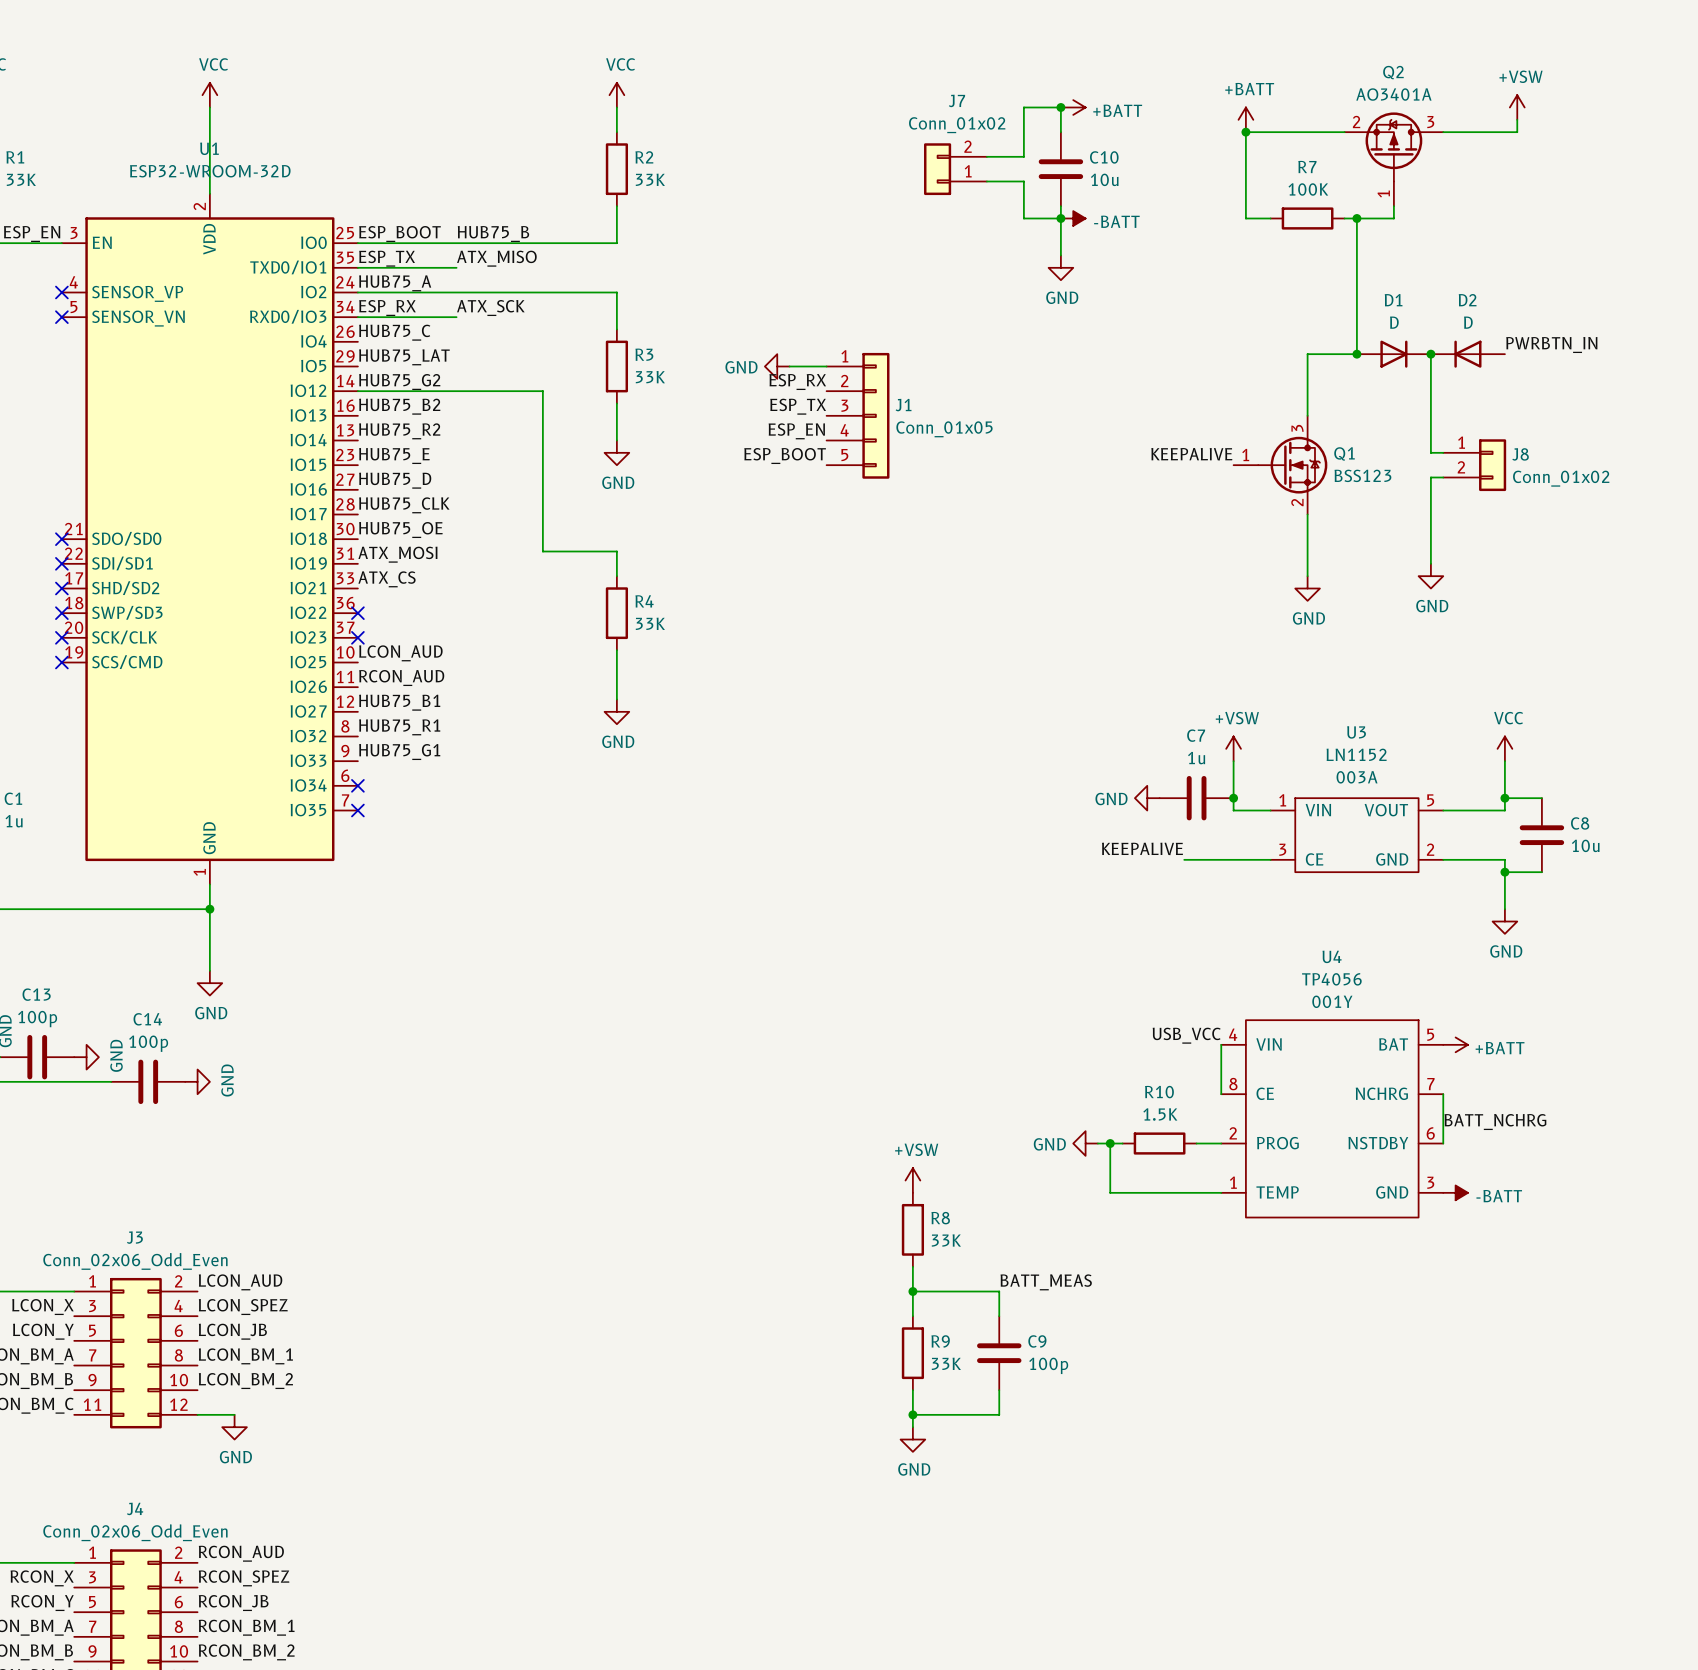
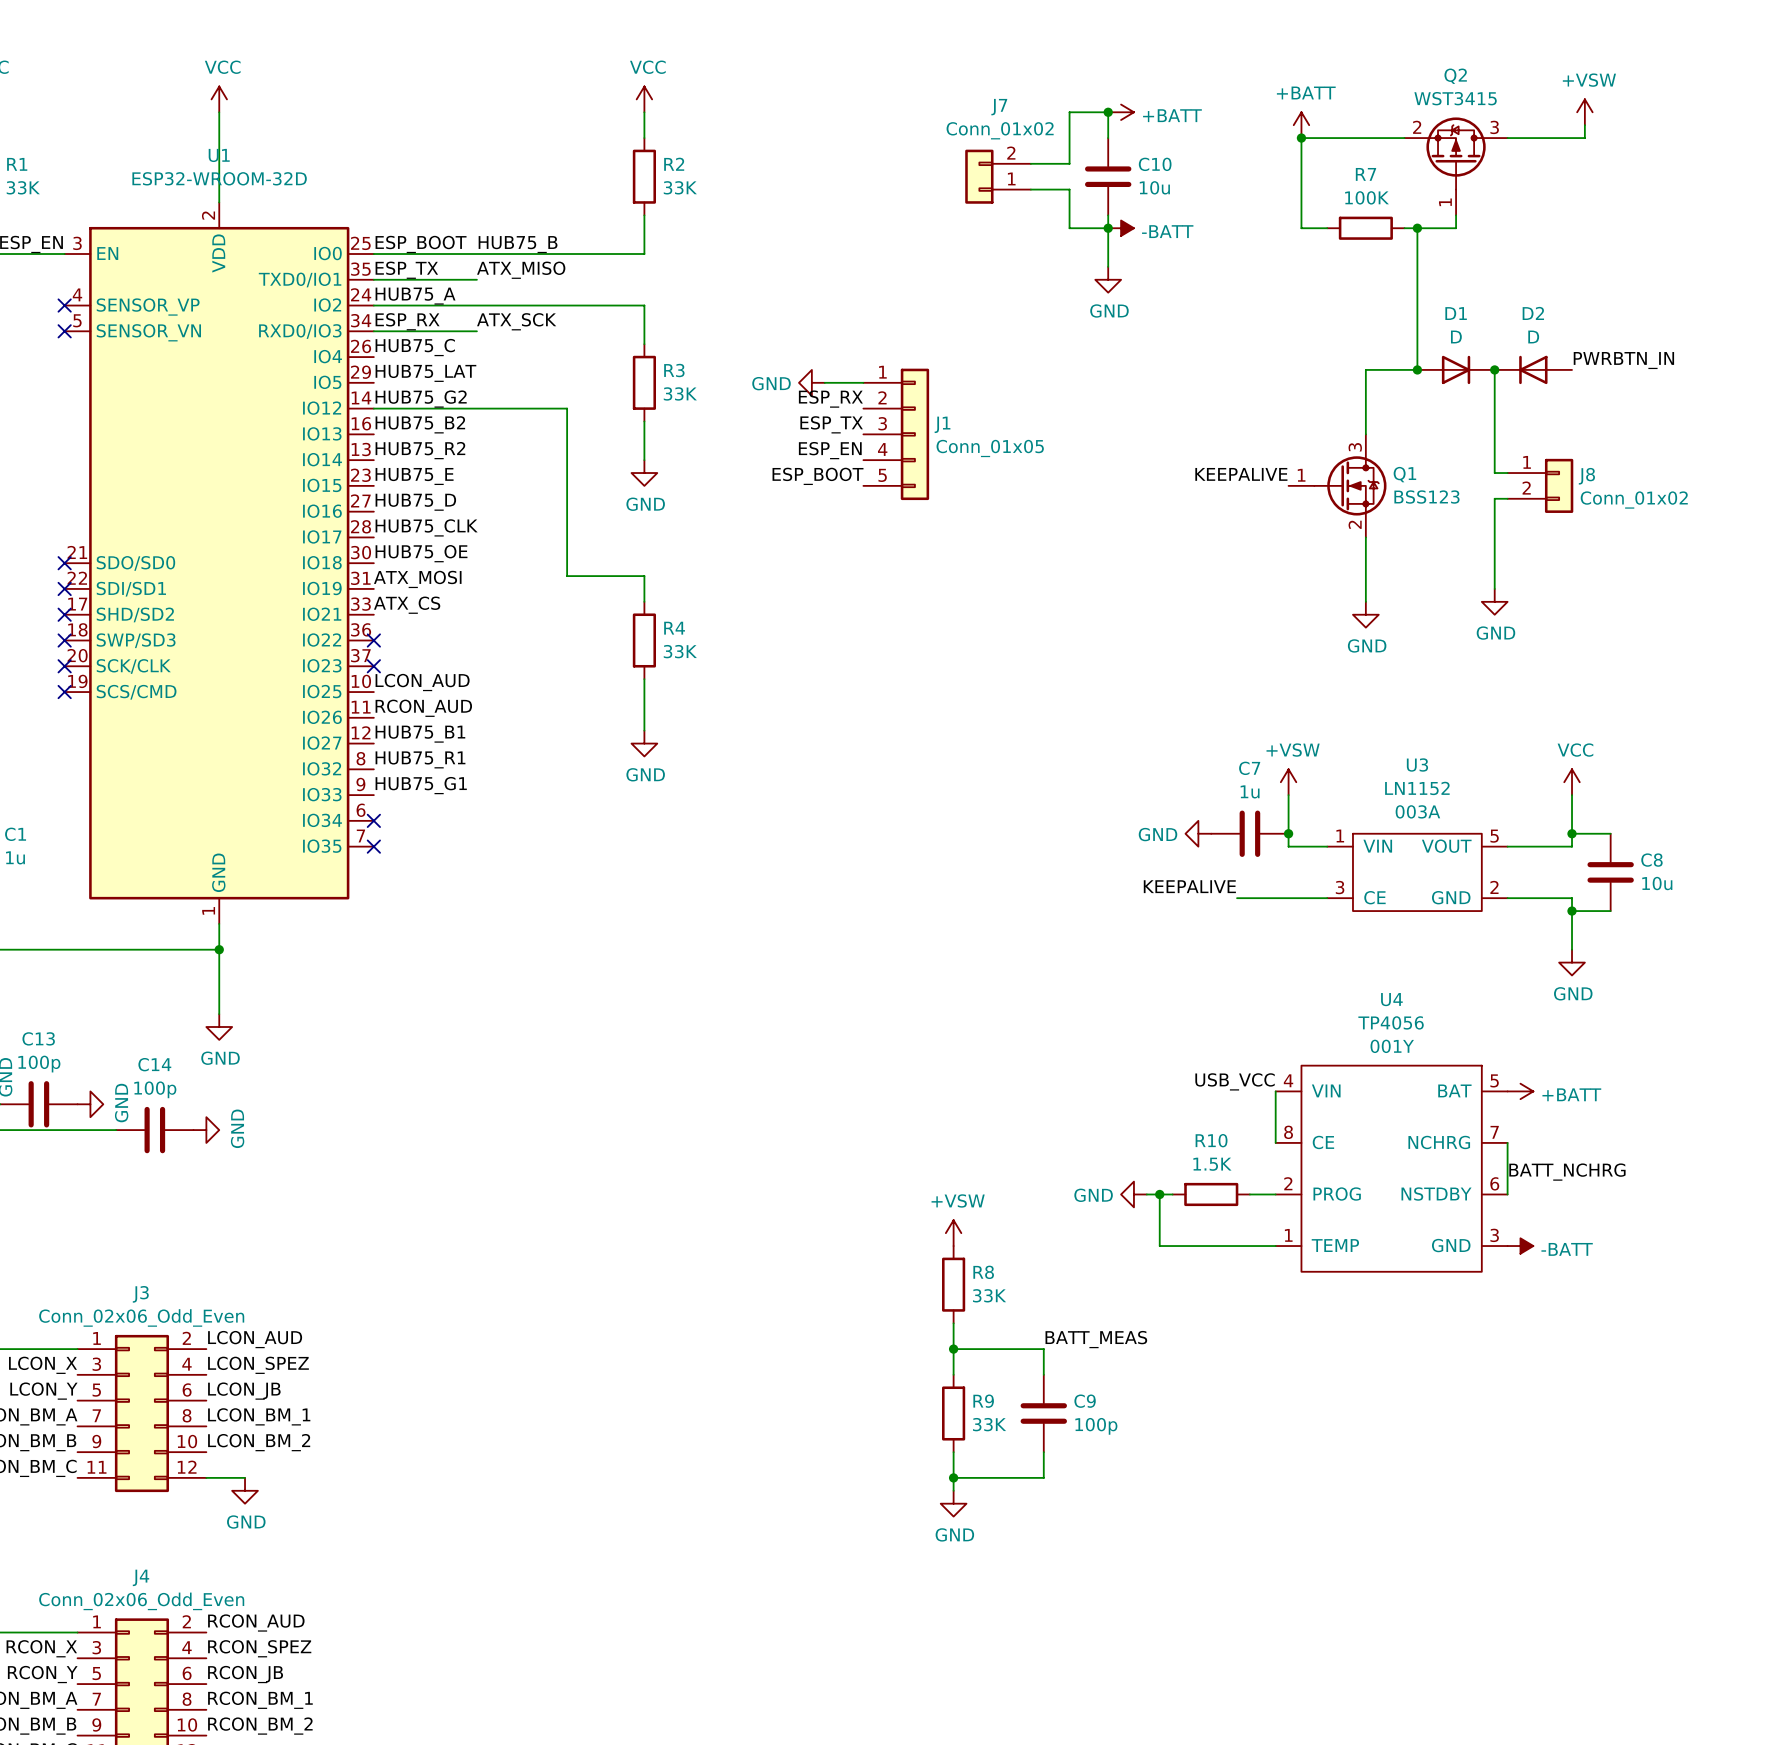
Q2 value: AO3401A (1393, 94) -> WST3415 (1455, 98)

